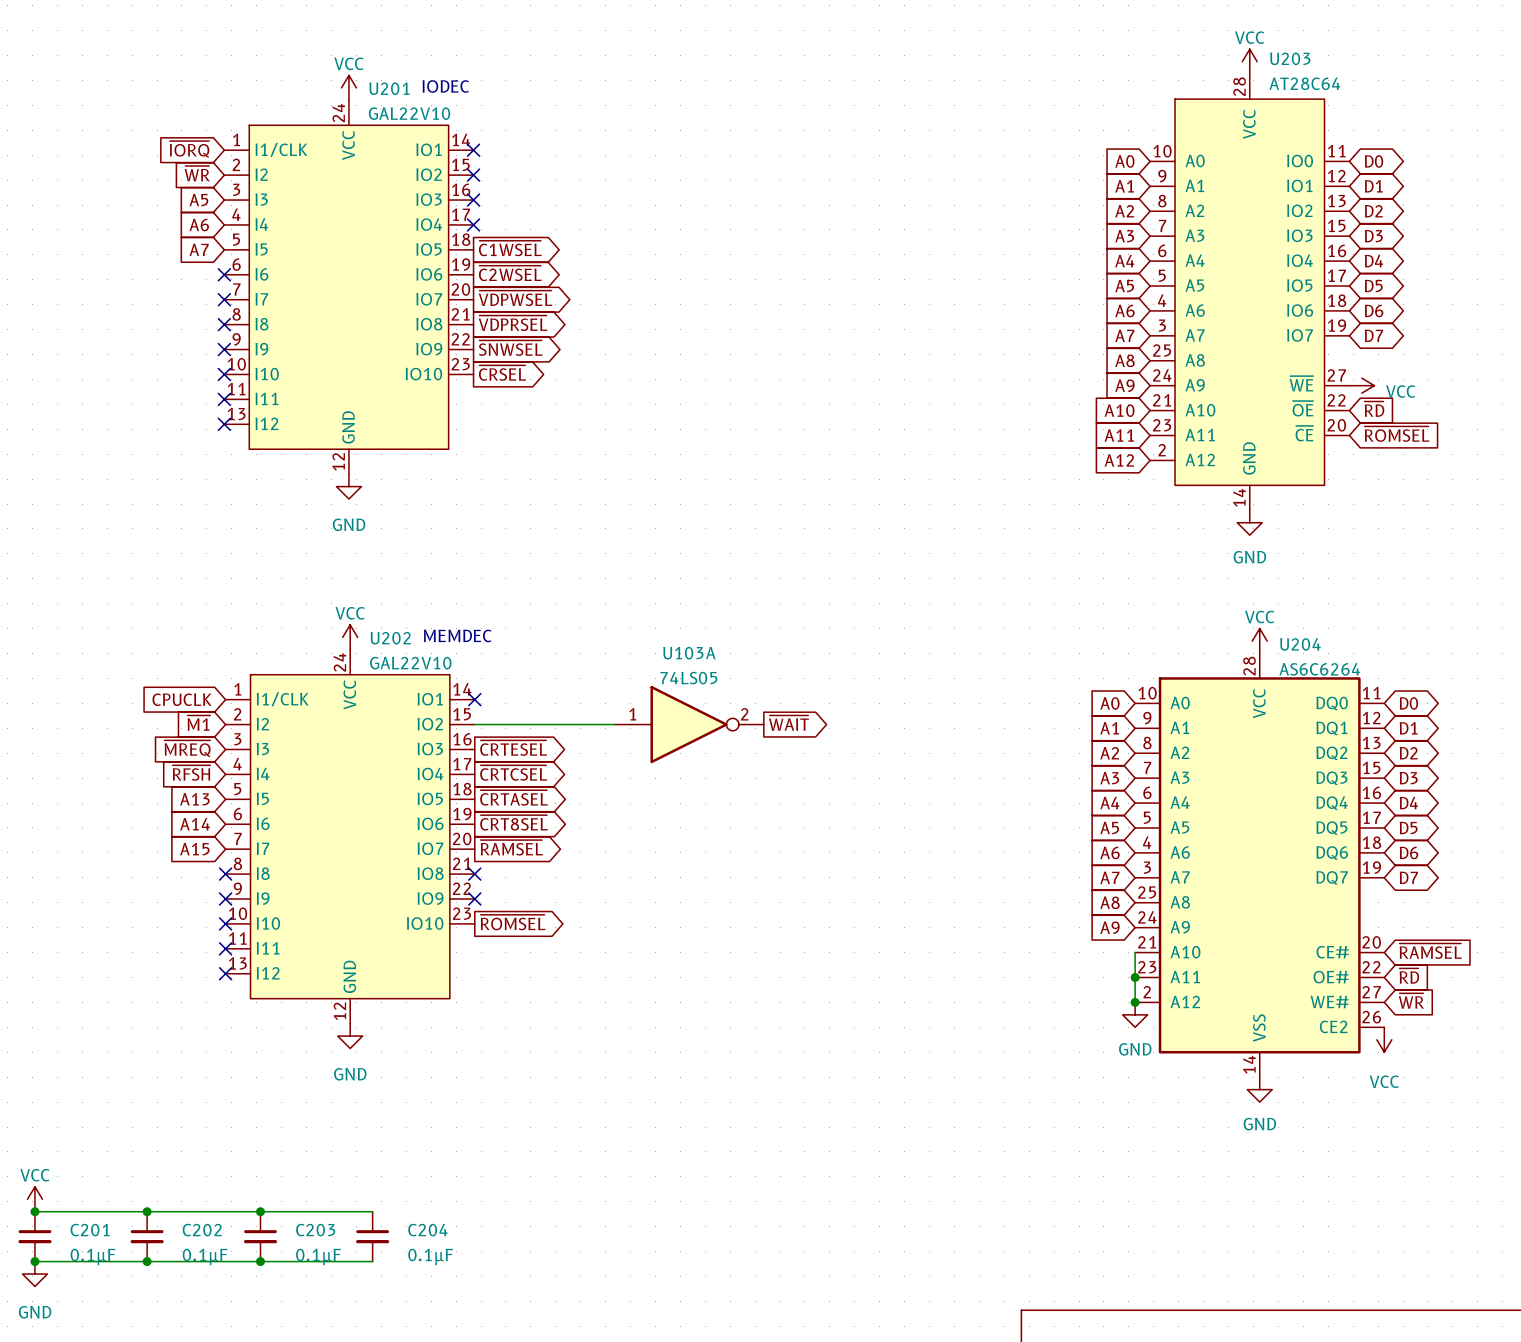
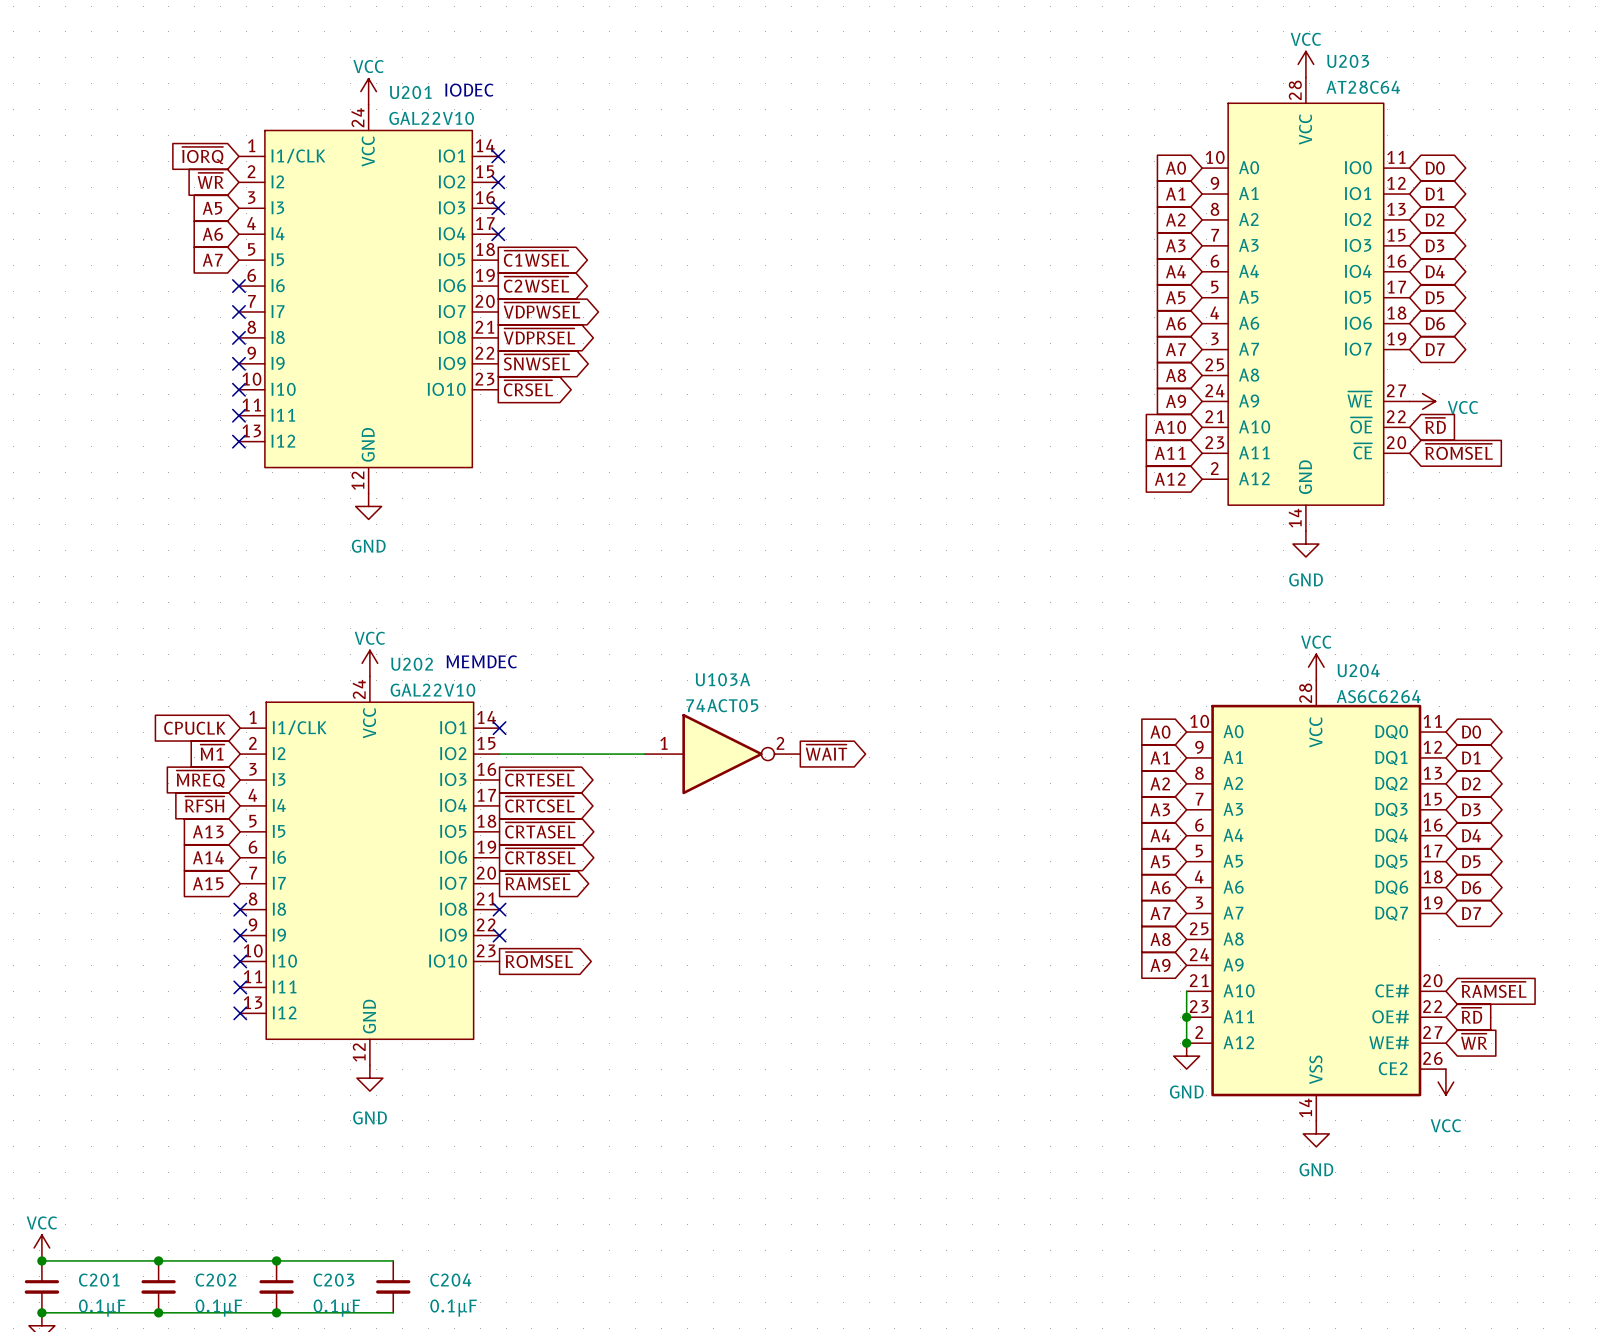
U103A value: 74LS05 (688, 678) -> 74ACT05 (722, 705)

